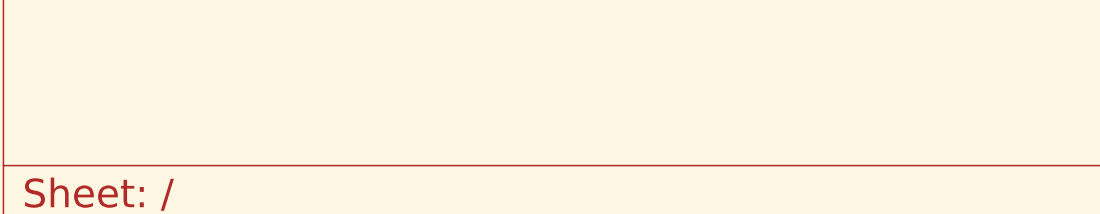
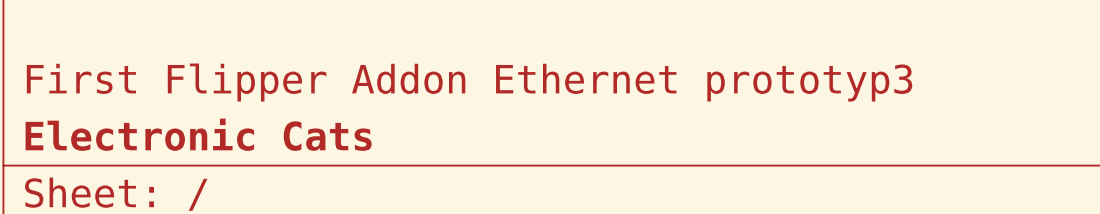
title block: none -> First Flipper Addon Ethernet prototyp3 (469, 82)
title block: none -> Electronic Cats (198, 134)

